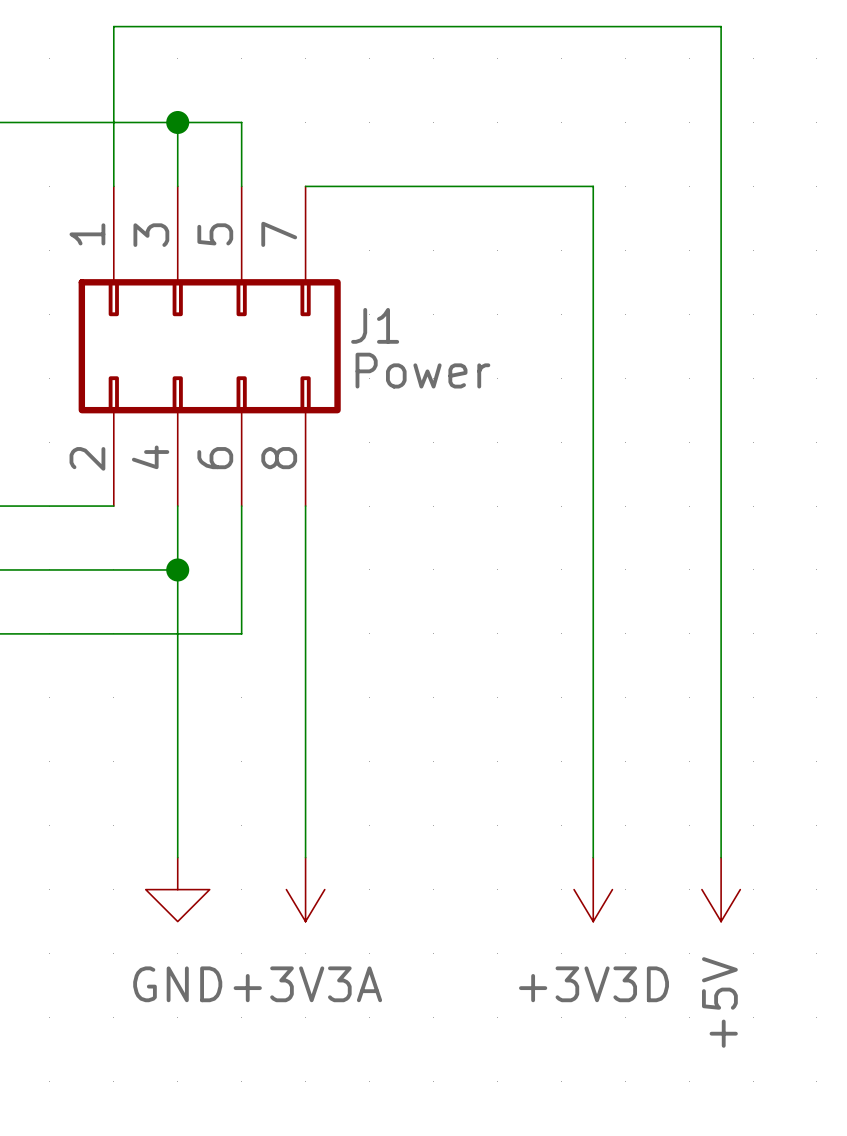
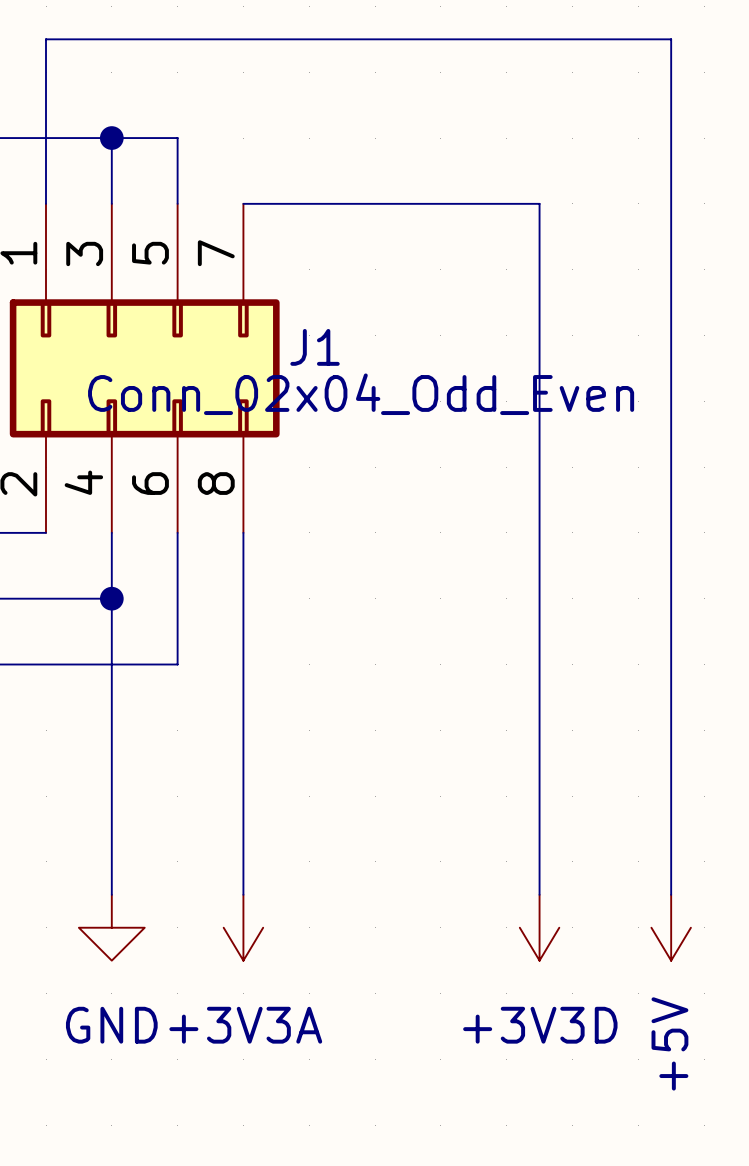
J1 value: Power (422, 370) -> Conn_02x04_Odd_Even (361, 394)

